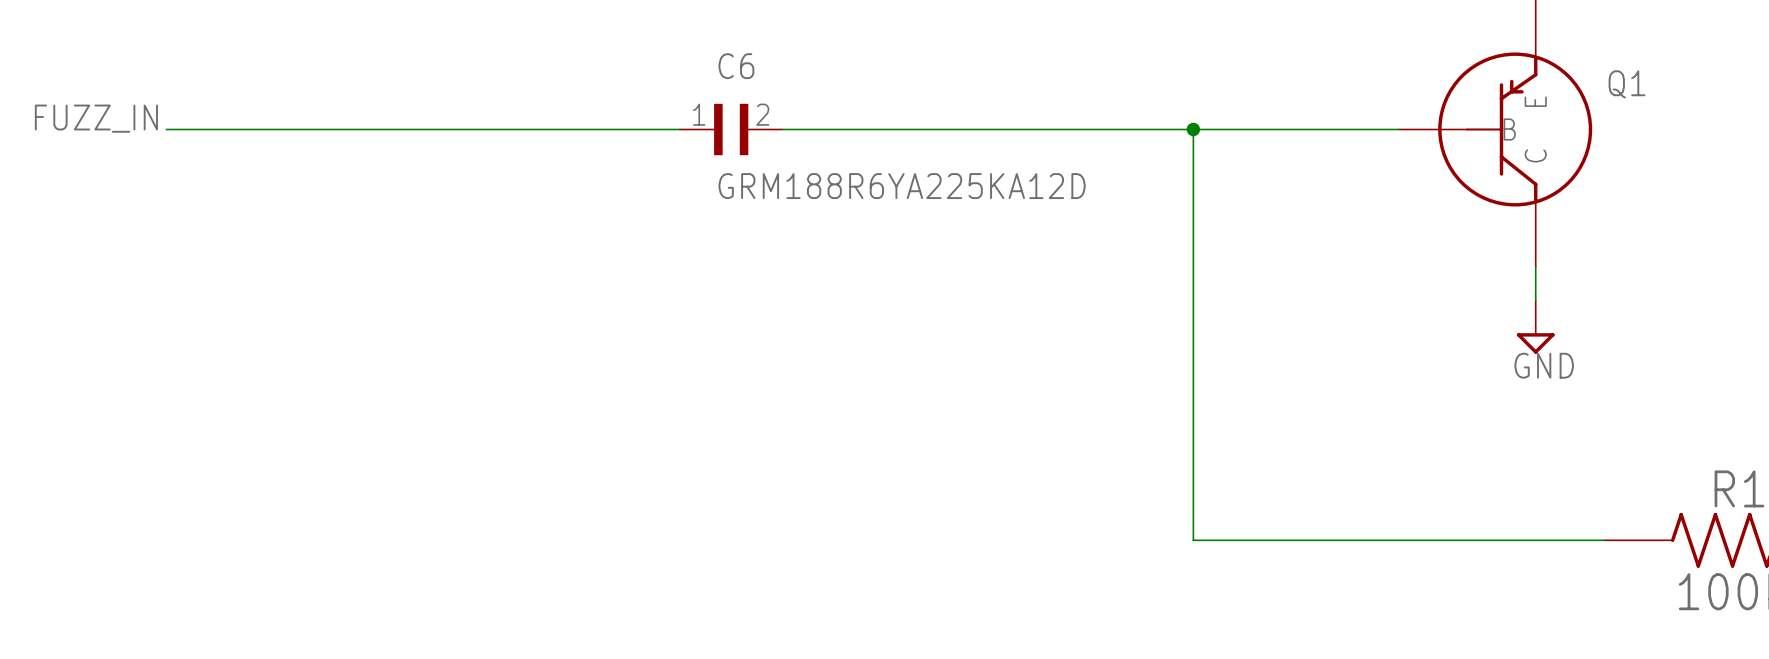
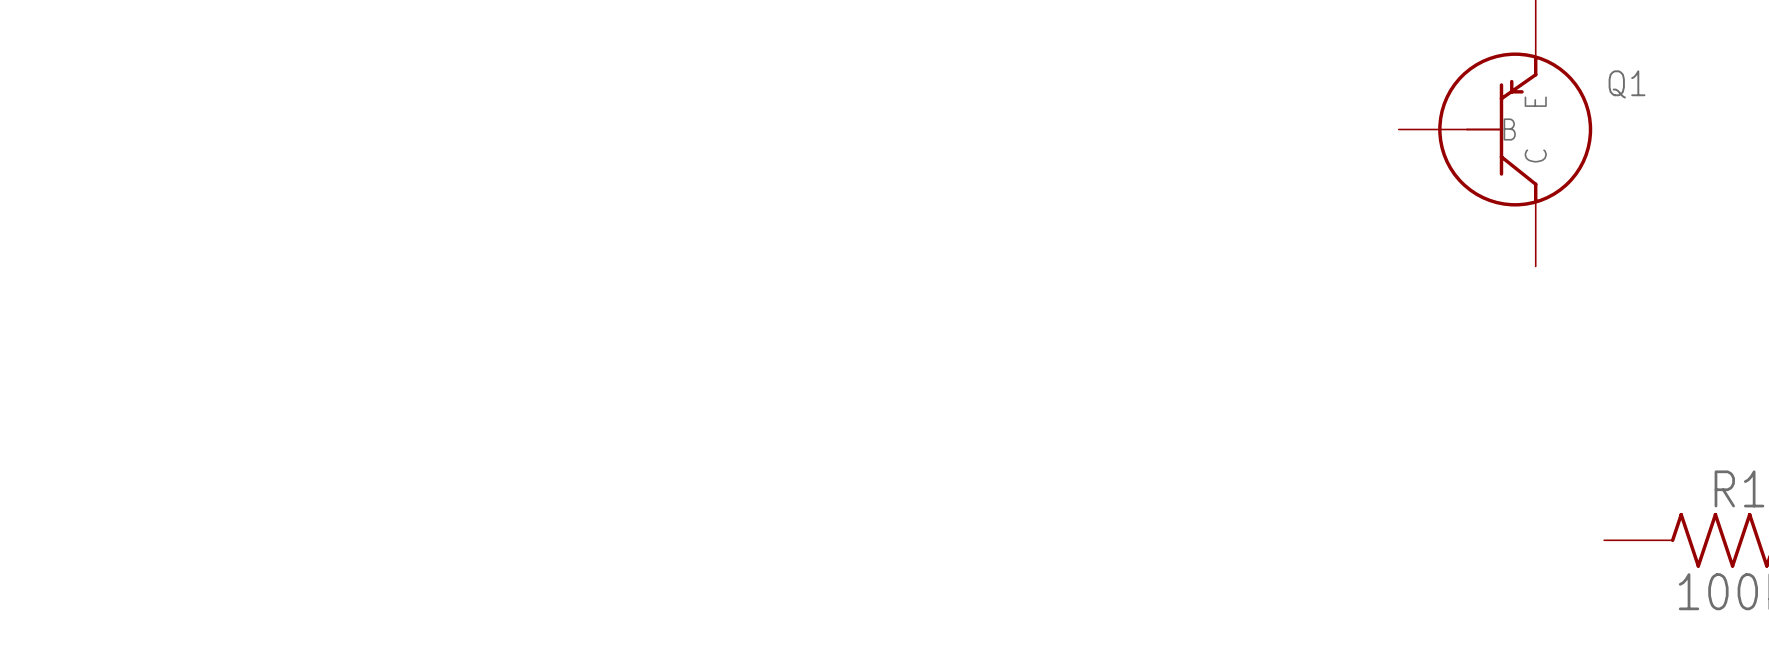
label: FUZZ_IN (96, 118) -> none
wire: (166, 129) (679, 129) -> none
C6: GRM188R6YA225KA12D (731, 129) -> none
wire: (782, 129) (1398, 129) -> none
wire: (1193, 129) (1193, 540) (1604, 540) -> none
junction: (1193, 129) -> none
wire: (1535, 266) (1535, 300) -> none
power symbol: GND (1535, 327) -> none

